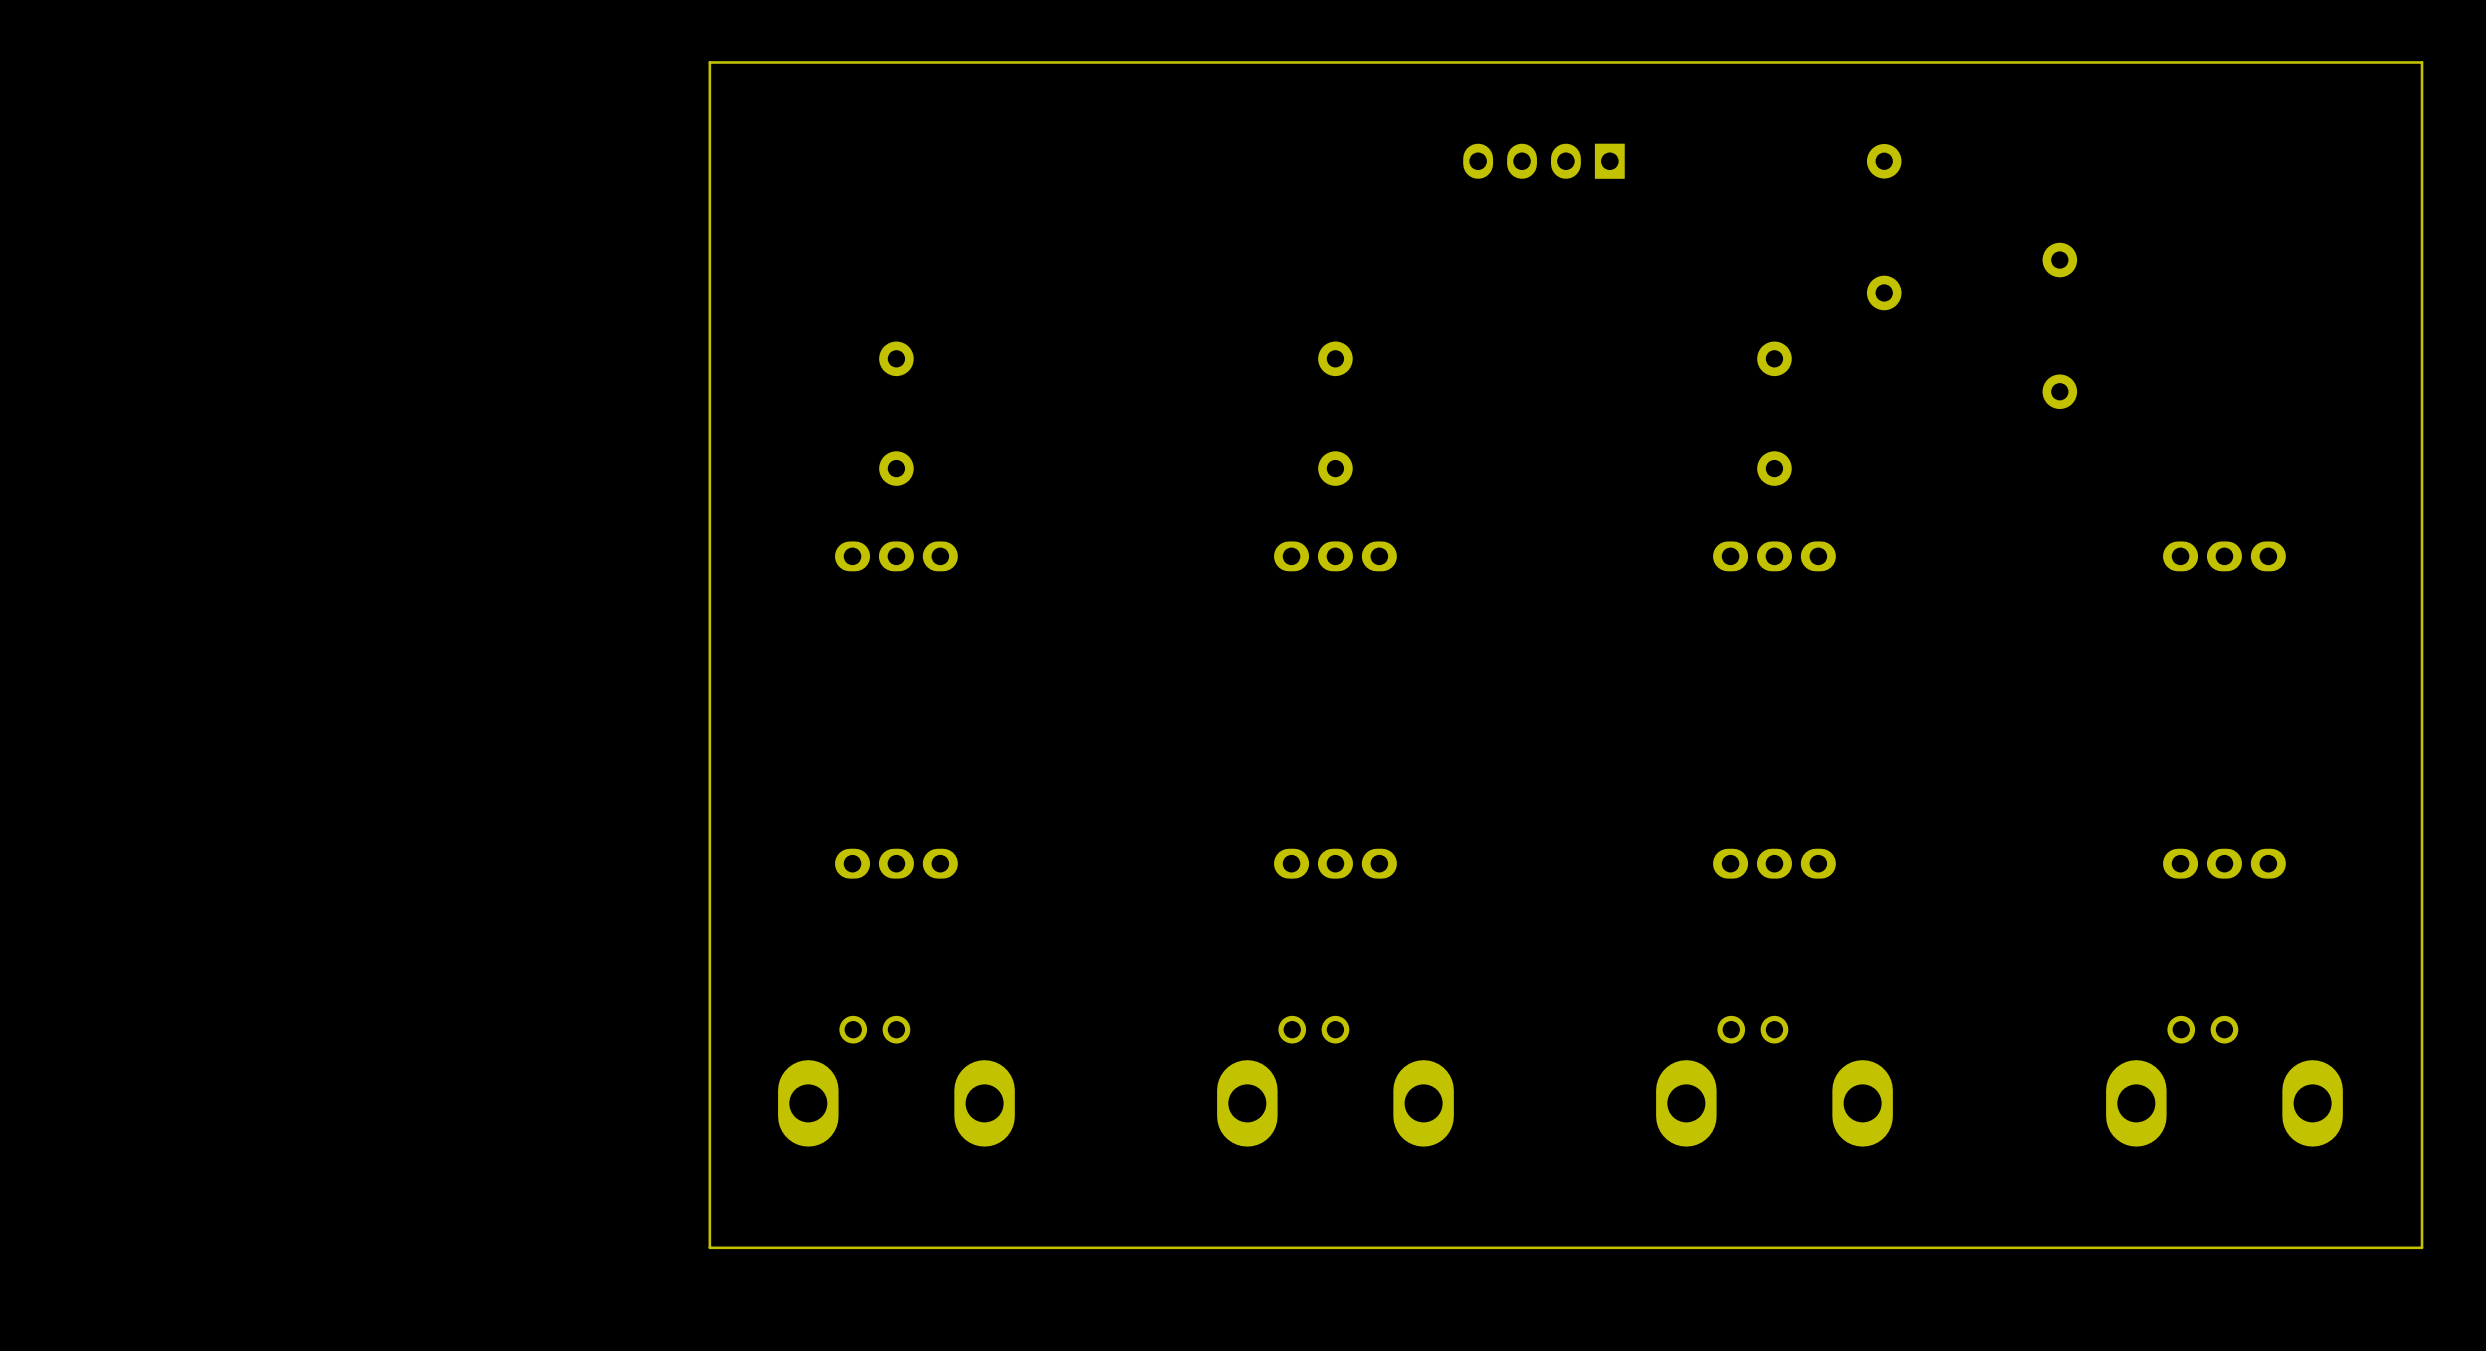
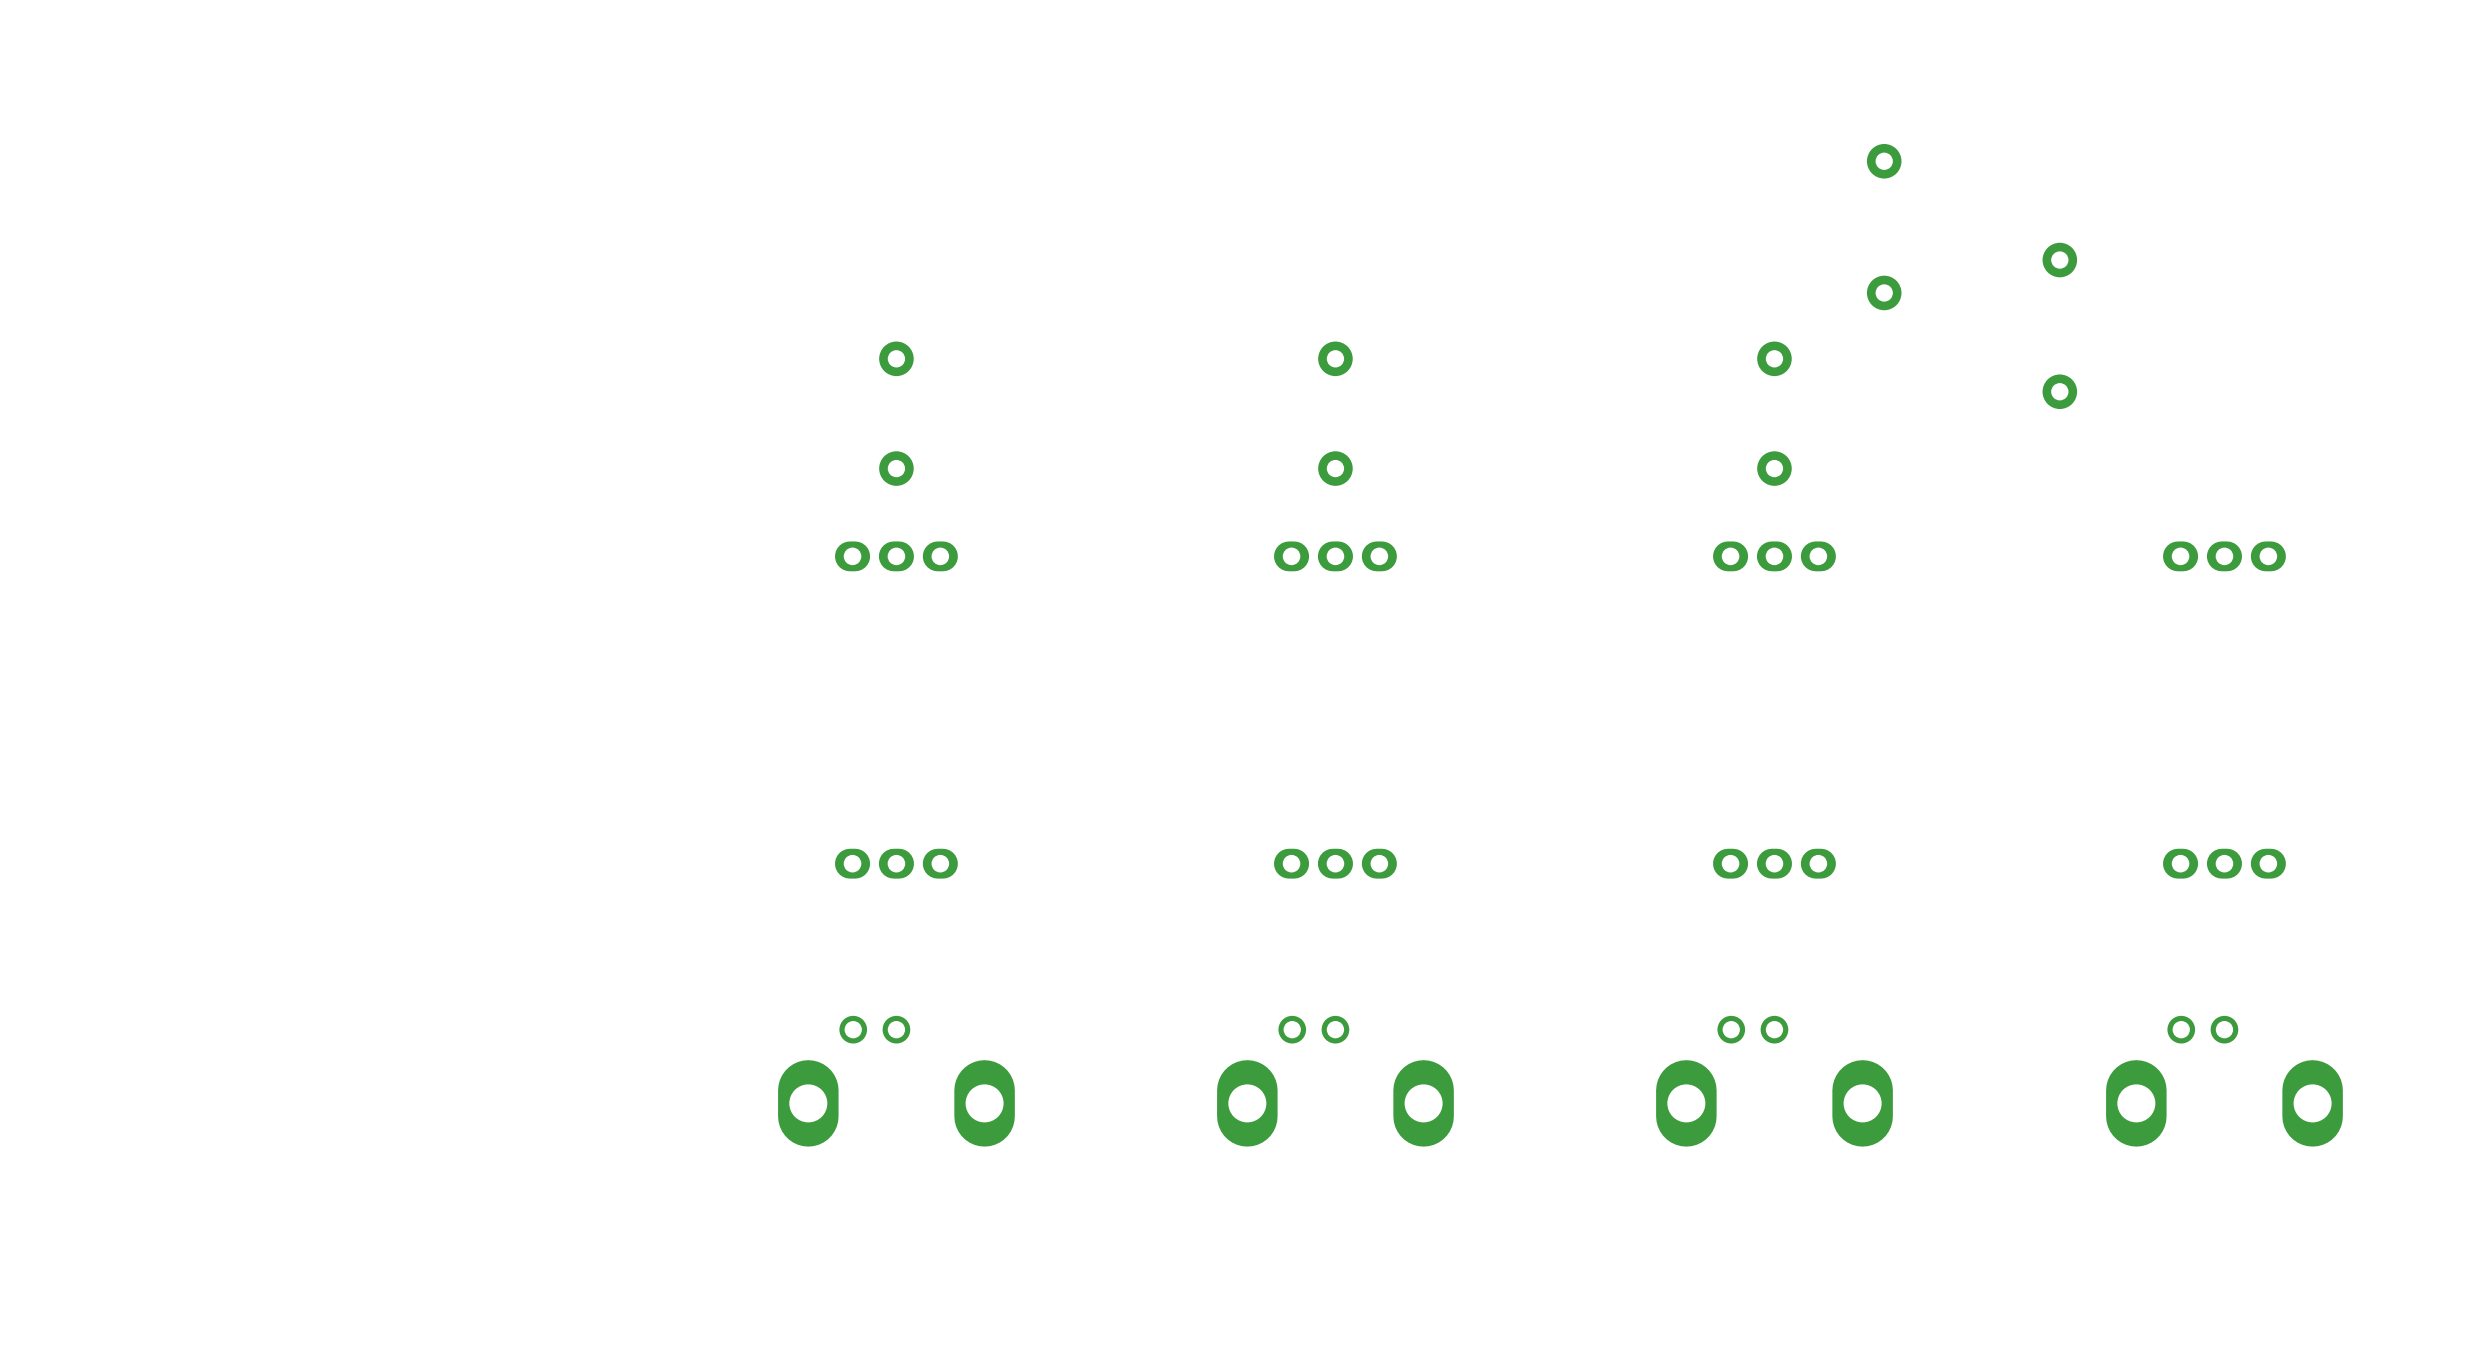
board edge: (2422, 62) (2422, 1247) (709, 1247) (709, 62) (2422, 62) -> none
part: (1543, 161) -> none

